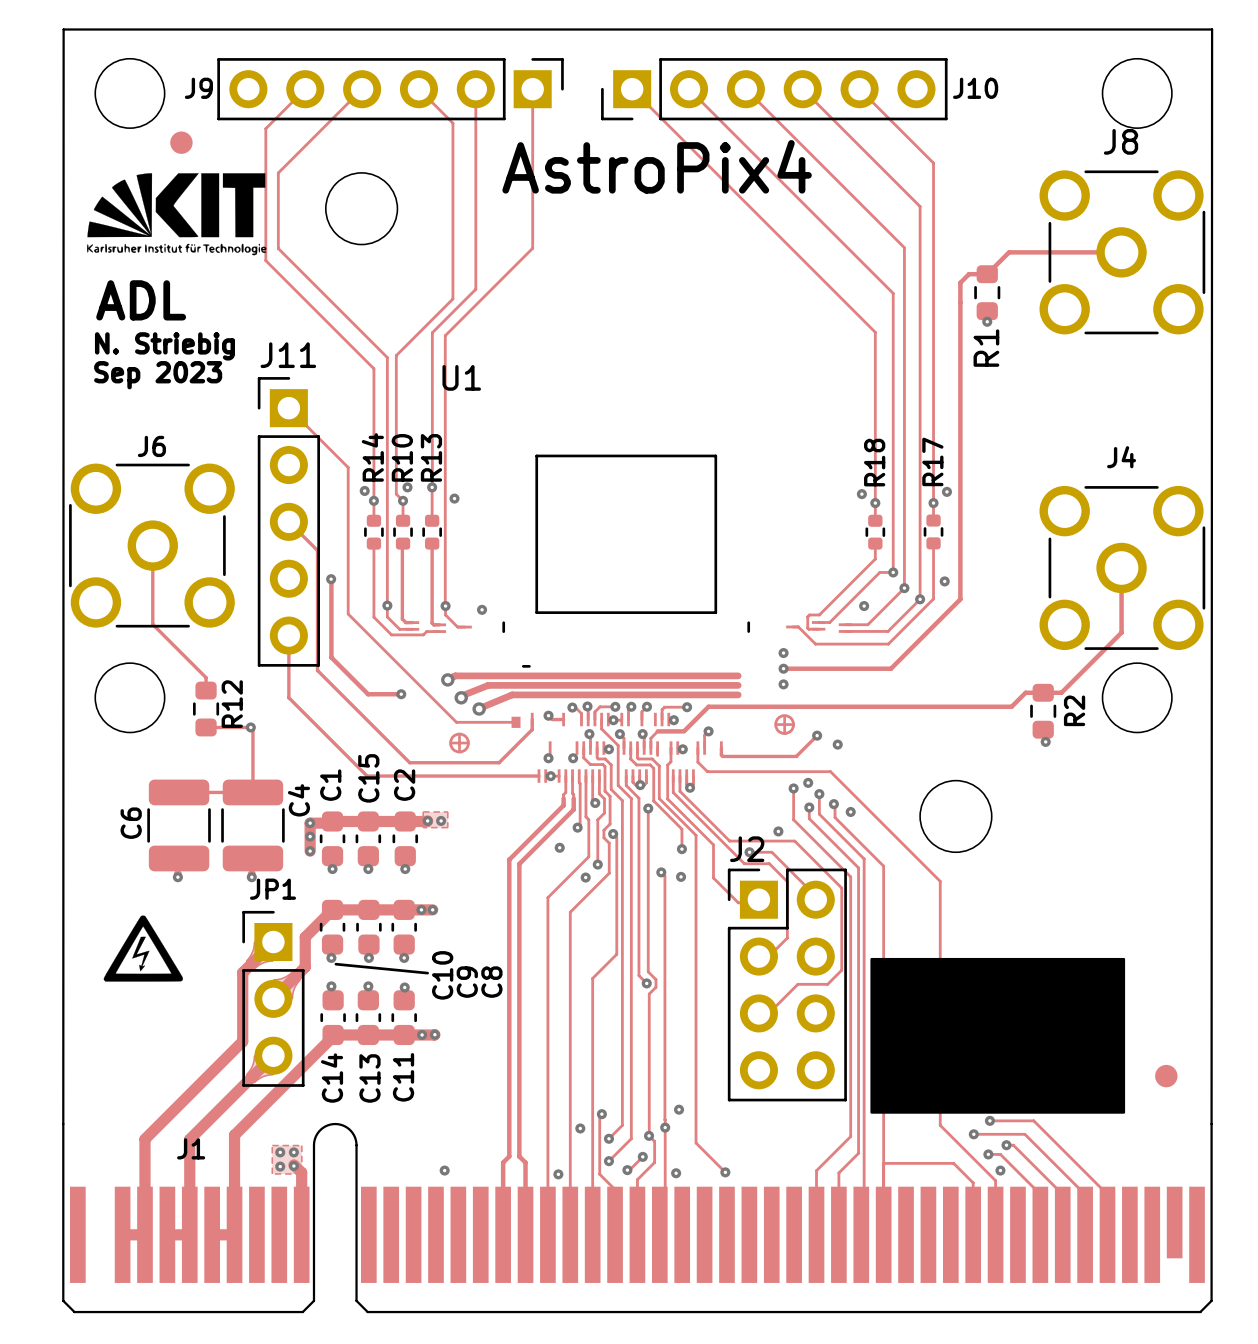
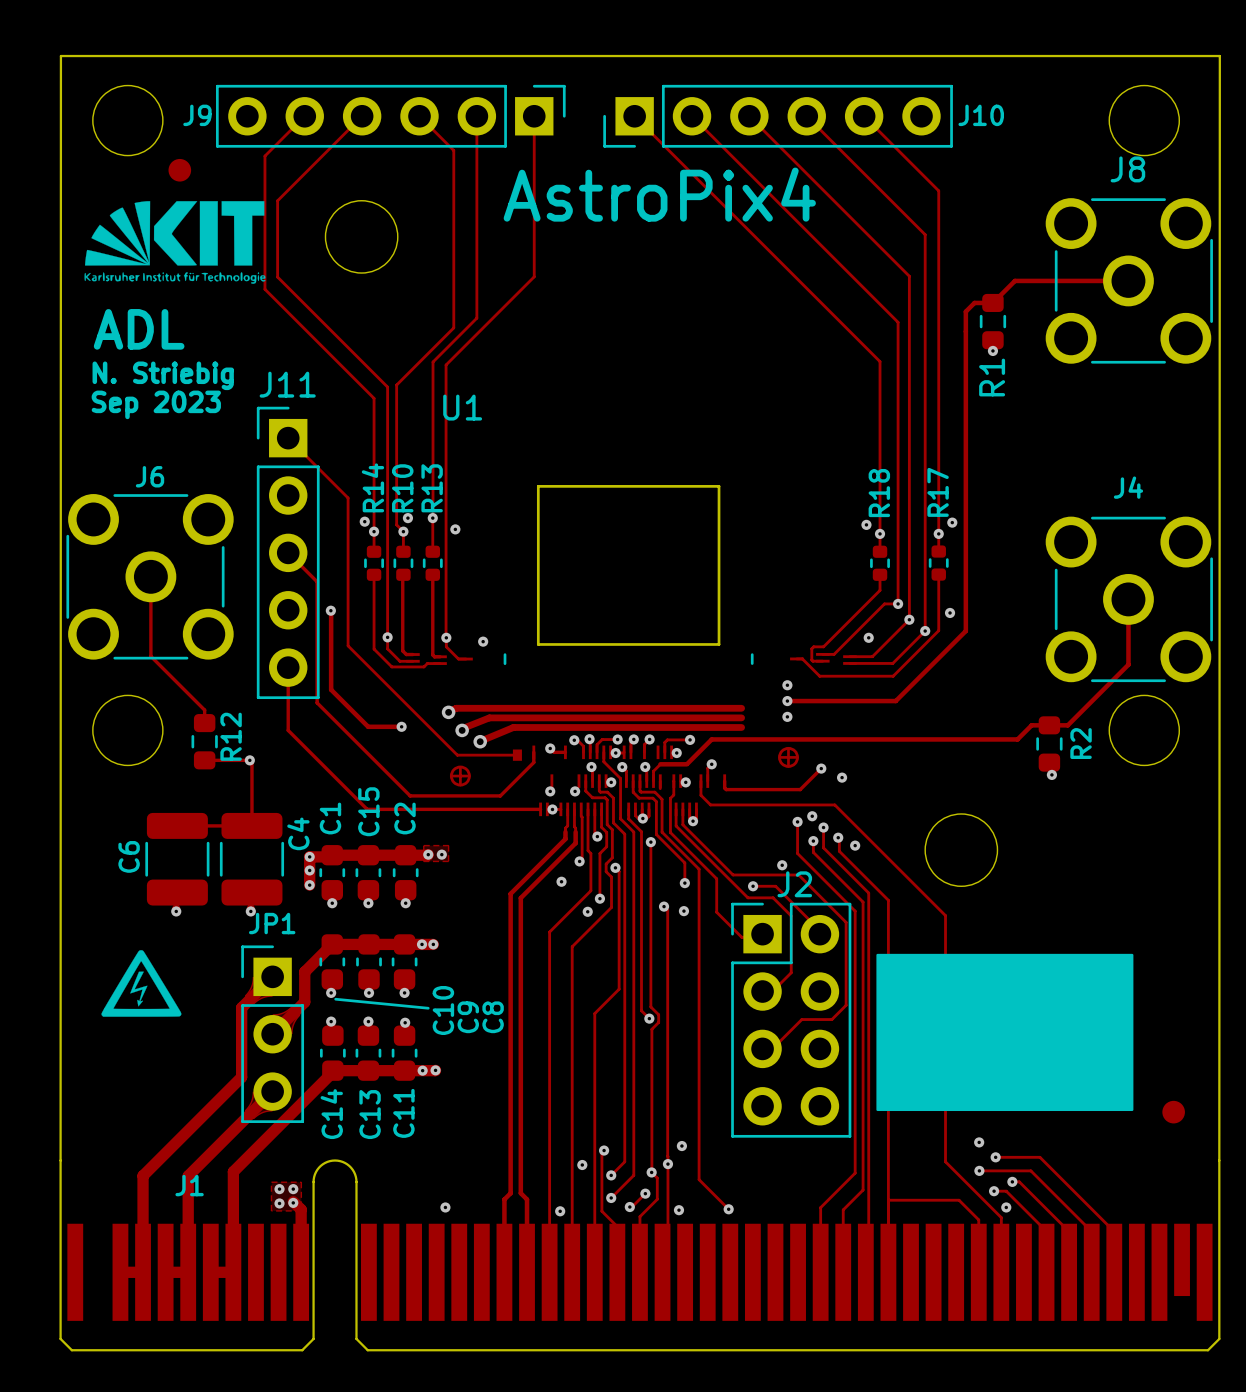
U1 footprint: [405, 454, 853, 783] -> [406, 485, 857, 817]
J2 name position: J2 (747, 849) -> J2 (794, 884)
drawing position: (997, 1035) -> (1004, 1032)

